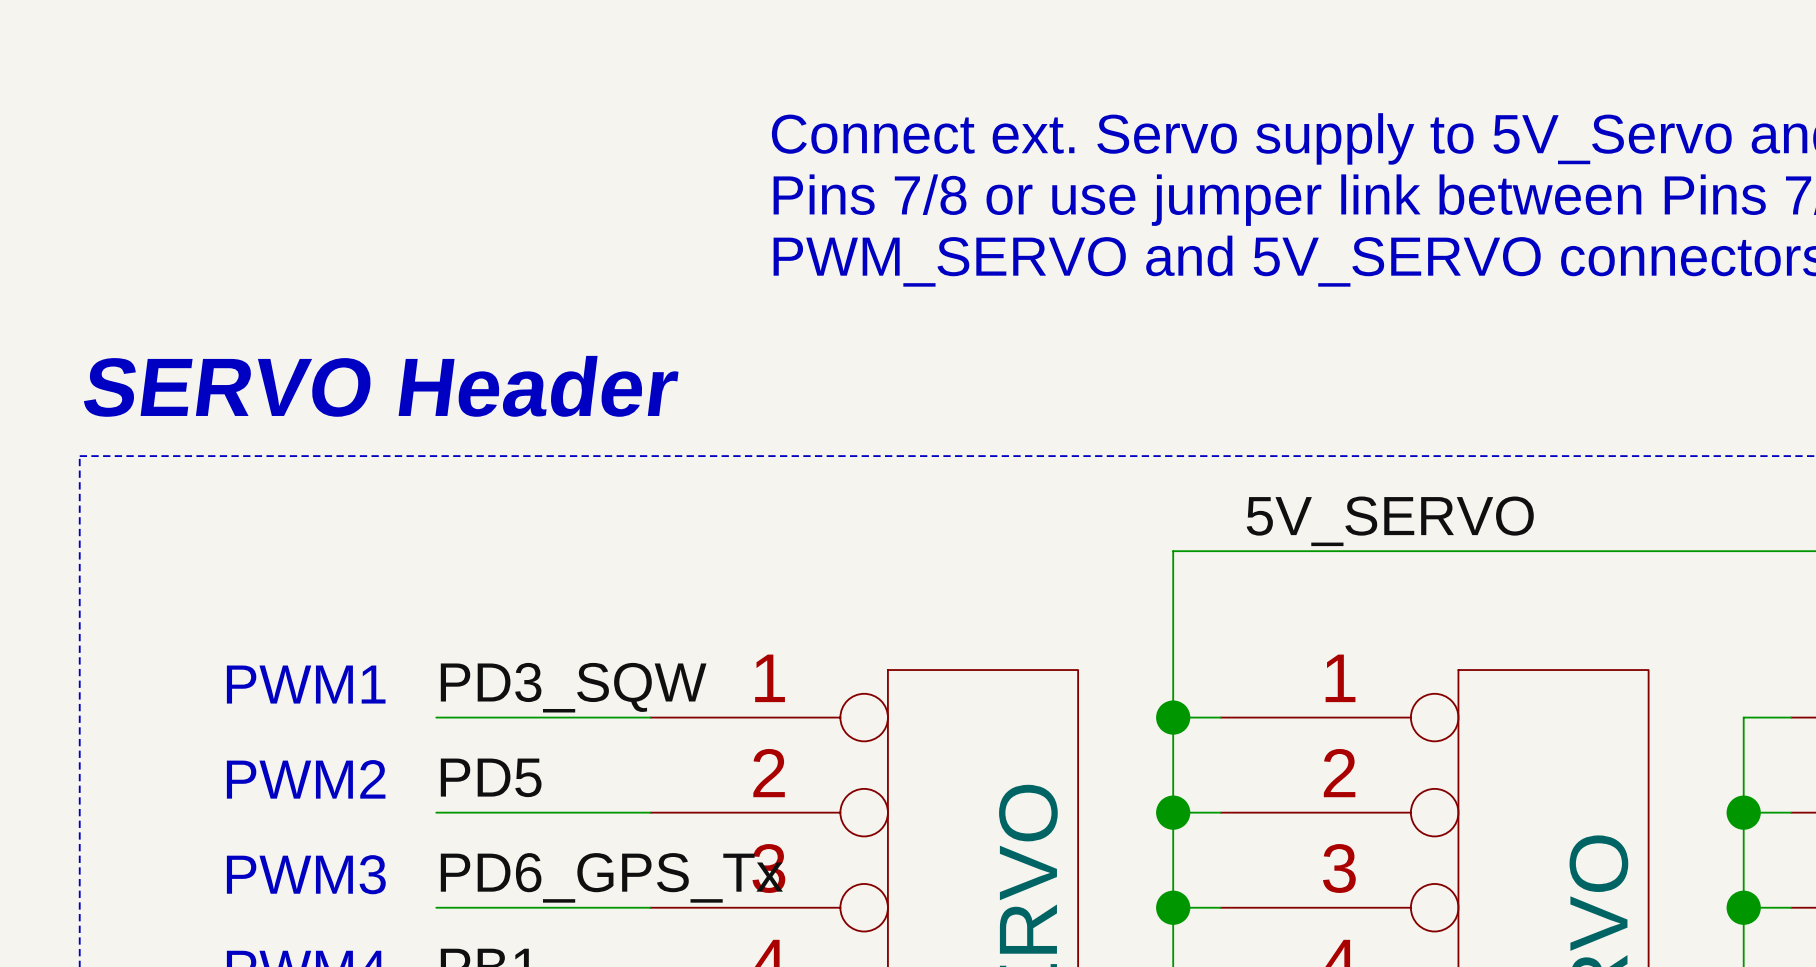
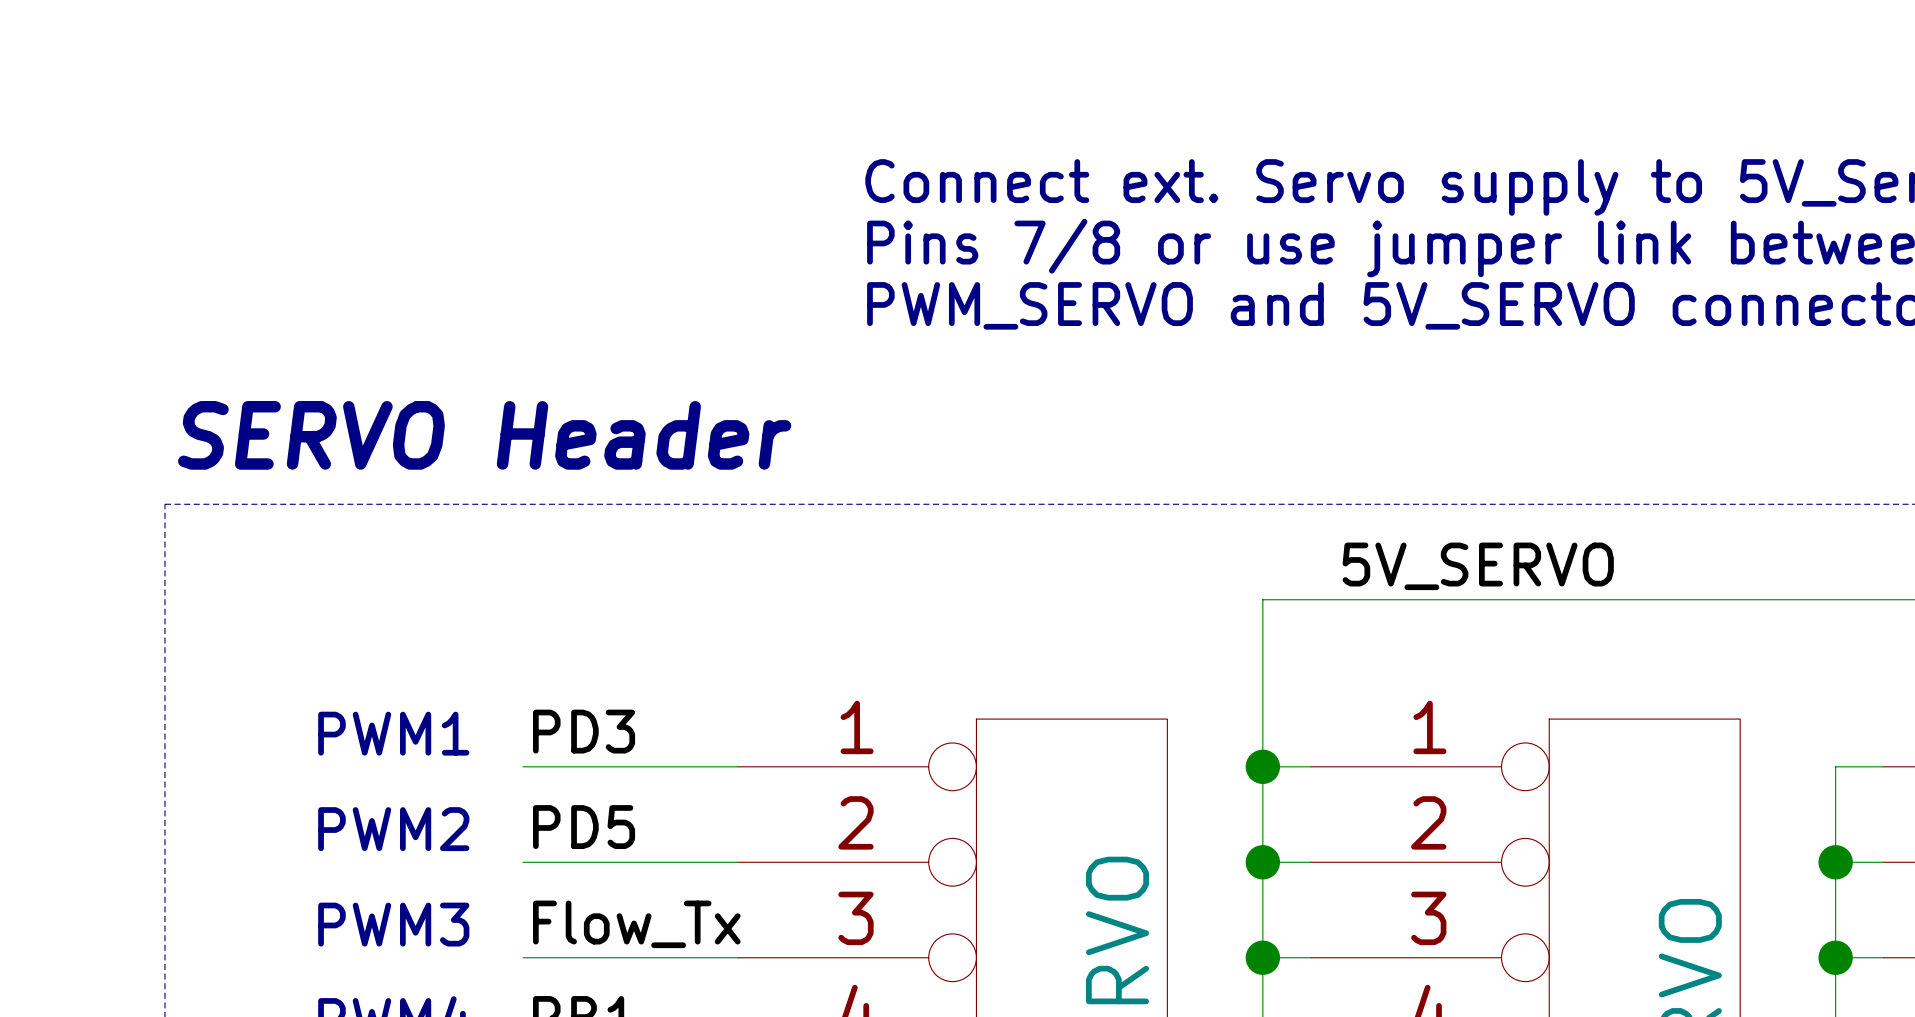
label: PD3_SQW (573, 687) -> PD3 (584, 731)
label: PD6_GPS_Tx (611, 877) -> Flow_Tx (636, 924)

